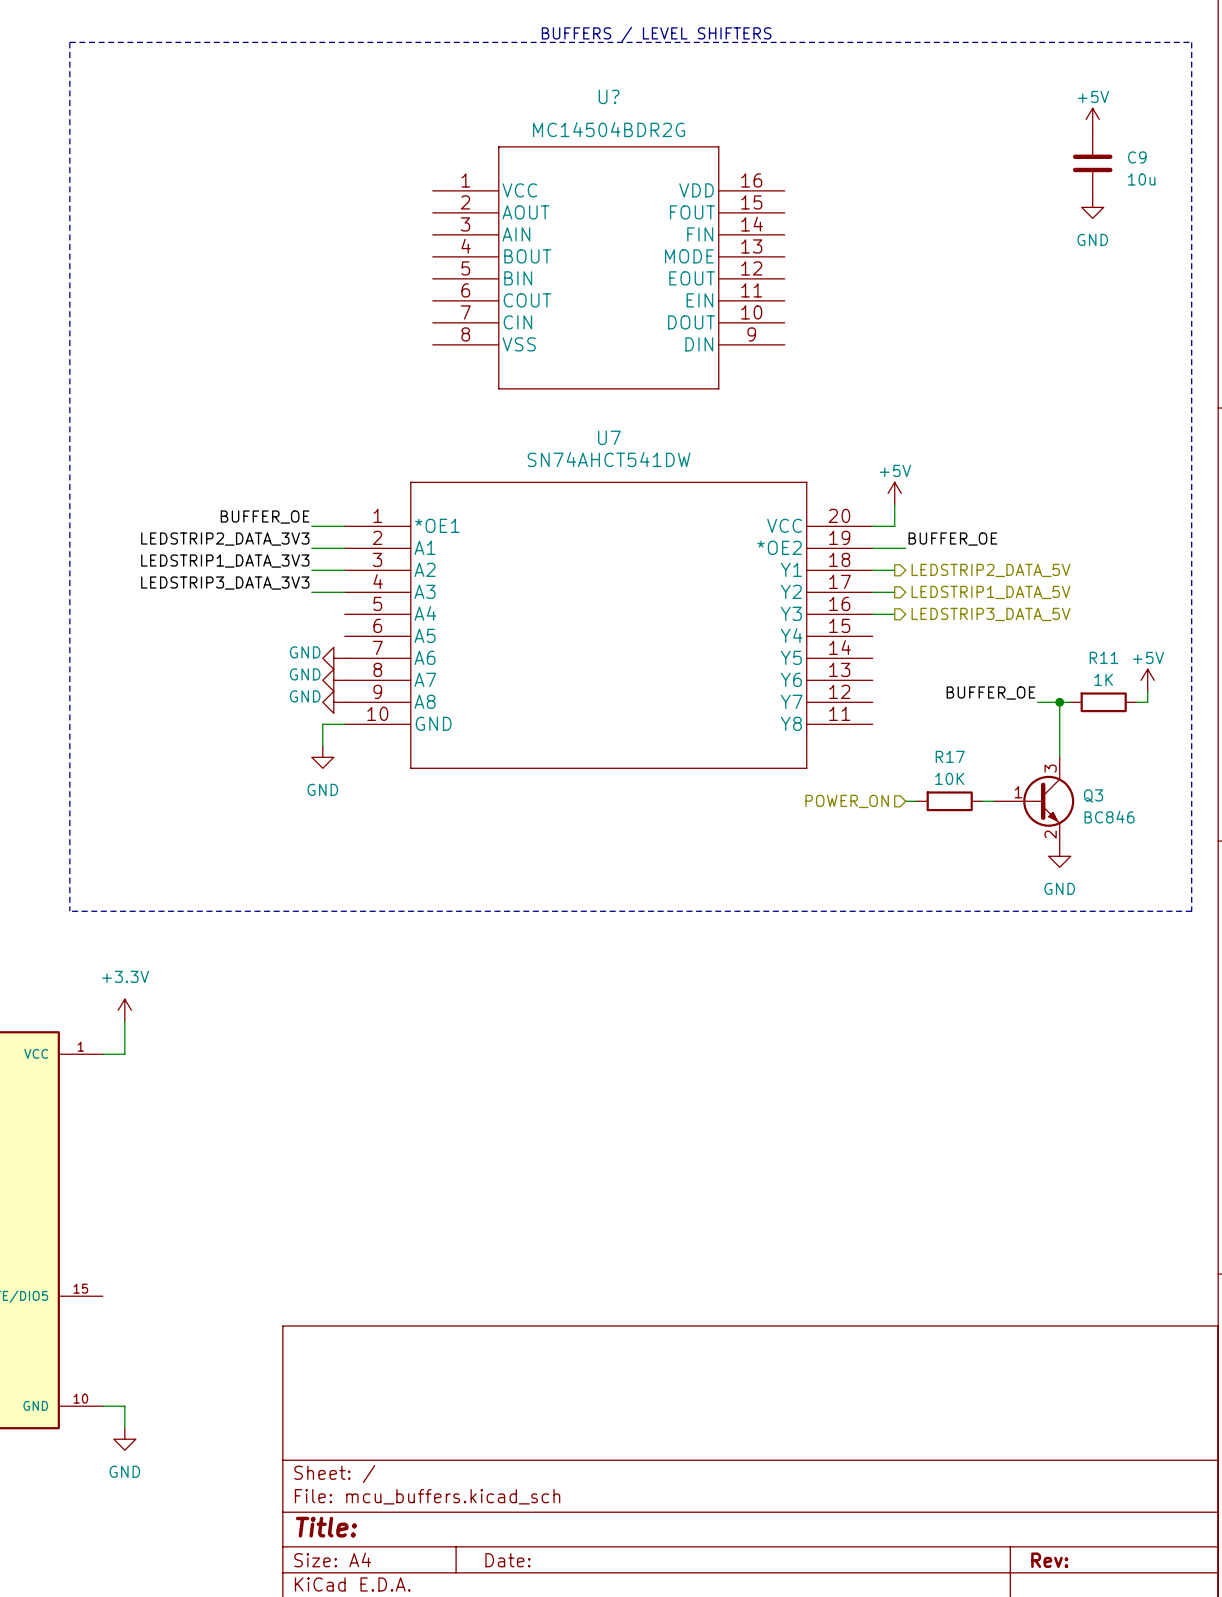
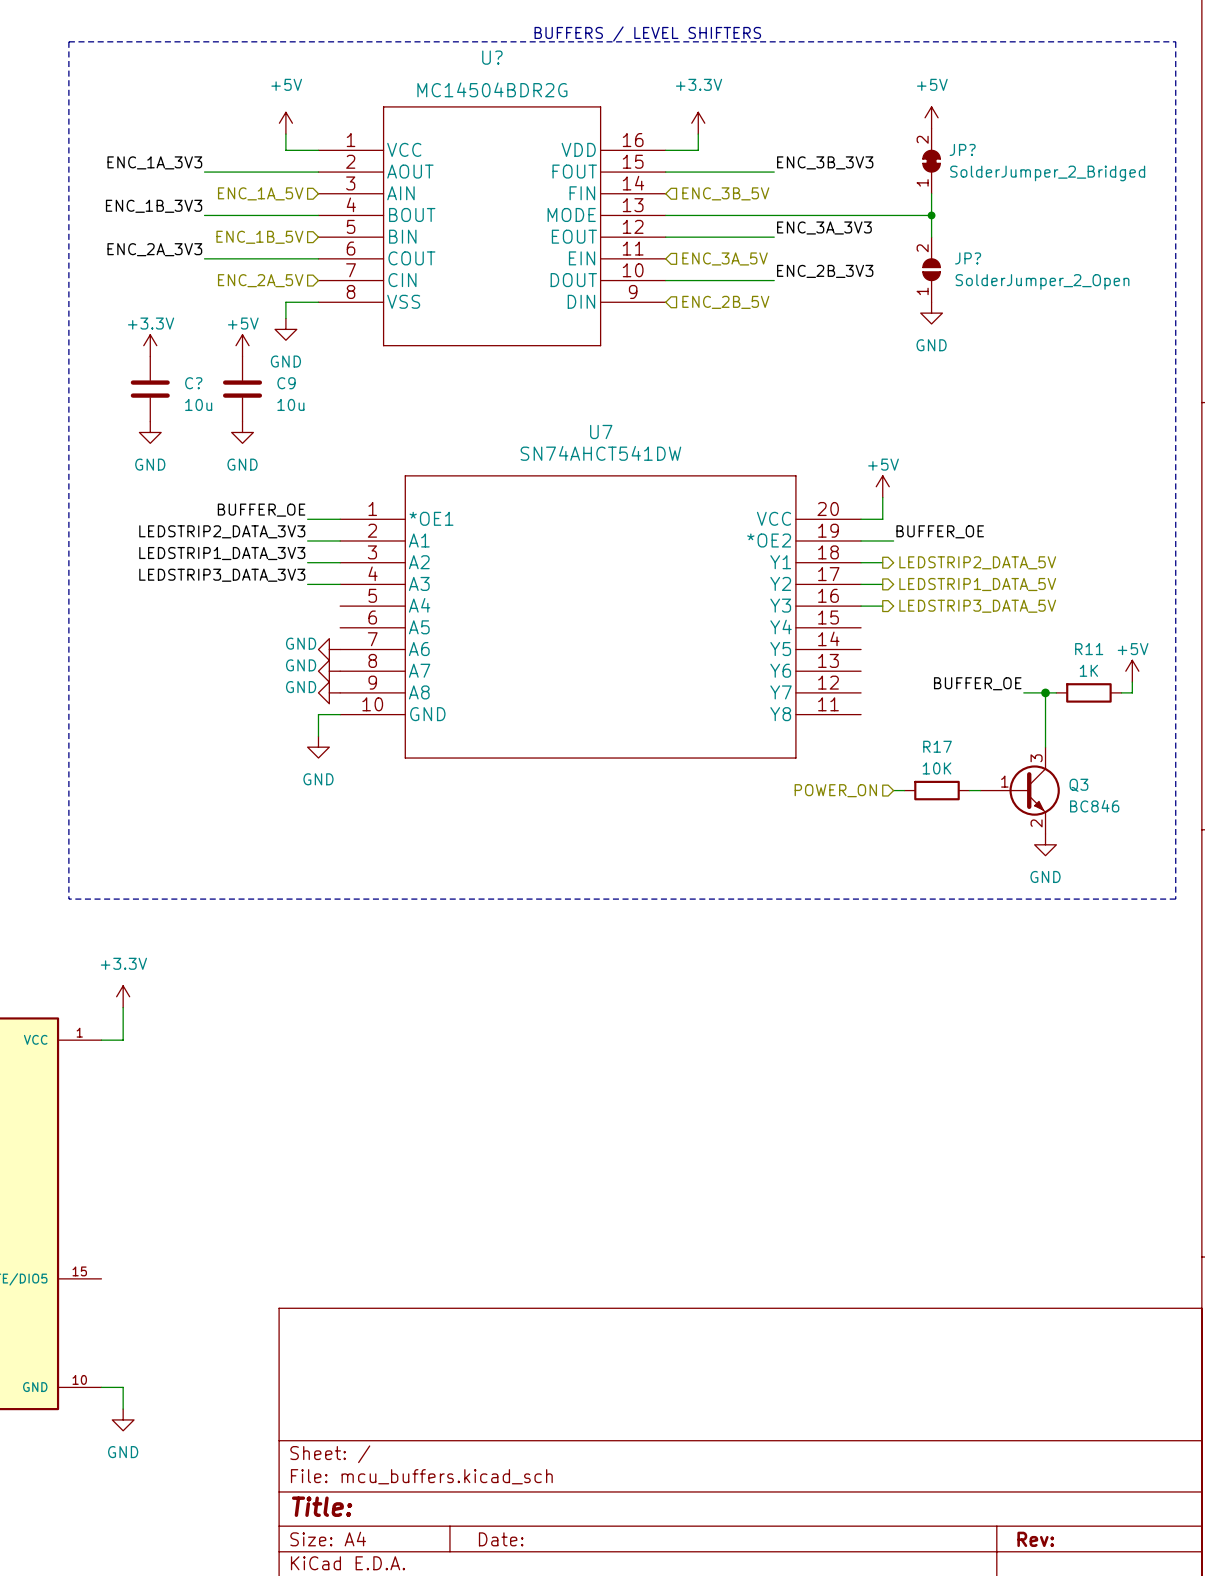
power symbol text position: +5V (1093, 96) -> +5V (932, 84)
power symbol position: +5V (1092, 119) -> +5V (931, 117)
power symbol: none -> +5V (285, 123)
power symbol: none -> +3.3V (698, 123)
wire: none -> (285, 134) (285, 150) (318, 150)
wire: none -> (698, 134) (698, 150) (665, 150)
JP?: none -> SolderJumper_2_Bridged (931, 161)
C9 position: (1092, 163) -> (242, 389)
label: none -> ENC_1A_3V3 (154, 162)
label: none -> ENC_3B_3V3 (825, 162)
wire: none -> (204, 172) (318, 172)
wire: none -> (665, 172) (774, 172)
hierarchical label: none -> ENC_1A_5V (260, 193)
hierarchical label: none -> ENC_3B_5V (725, 193)
wire: none -> (931, 193) (931, 237)
power symbol position: GND (1092, 207) -> GND (931, 313)
label: none -> ENC_1B_3V3 (154, 206)
wire: none -> (204, 215) (318, 215)
wire: none -> (665, 215) (931, 215)
junction: none -> (931, 215)
label: none -> ENC_3A_3V3 (824, 227)
hierarchical label: none -> ENC_1B_5V (259, 237)
wire: none -> (665, 237) (774, 237)
label: none -> ENC_2A_3V3 (154, 249)
wire: none -> (204, 258) (318, 258)
hierarchical label: none -> ENC_3A_5V (725, 258)
U? position: (608, 267) -> (492, 226)
JP?: none -> SolderJumper_2_Open (931, 269)
label: none -> ENC_2B_3V3 (825, 271)
hierarchical label: none -> ENC_2A_5V (260, 280)
wire: none -> (665, 280) (774, 280)
wire: none -> (318, 302) (285, 302) (285, 318)
hierarchical label: none -> ENC_2B_5V (725, 302)
power symbol: none -> GND (285, 329)
power symbol: none -> +3.3V (150, 345)
power symbol: none -> +5V (242, 345)
C?: none -> 10u (150, 389)
power symbol: none -> GND (150, 432)
power symbol: none -> GND (242, 432)

